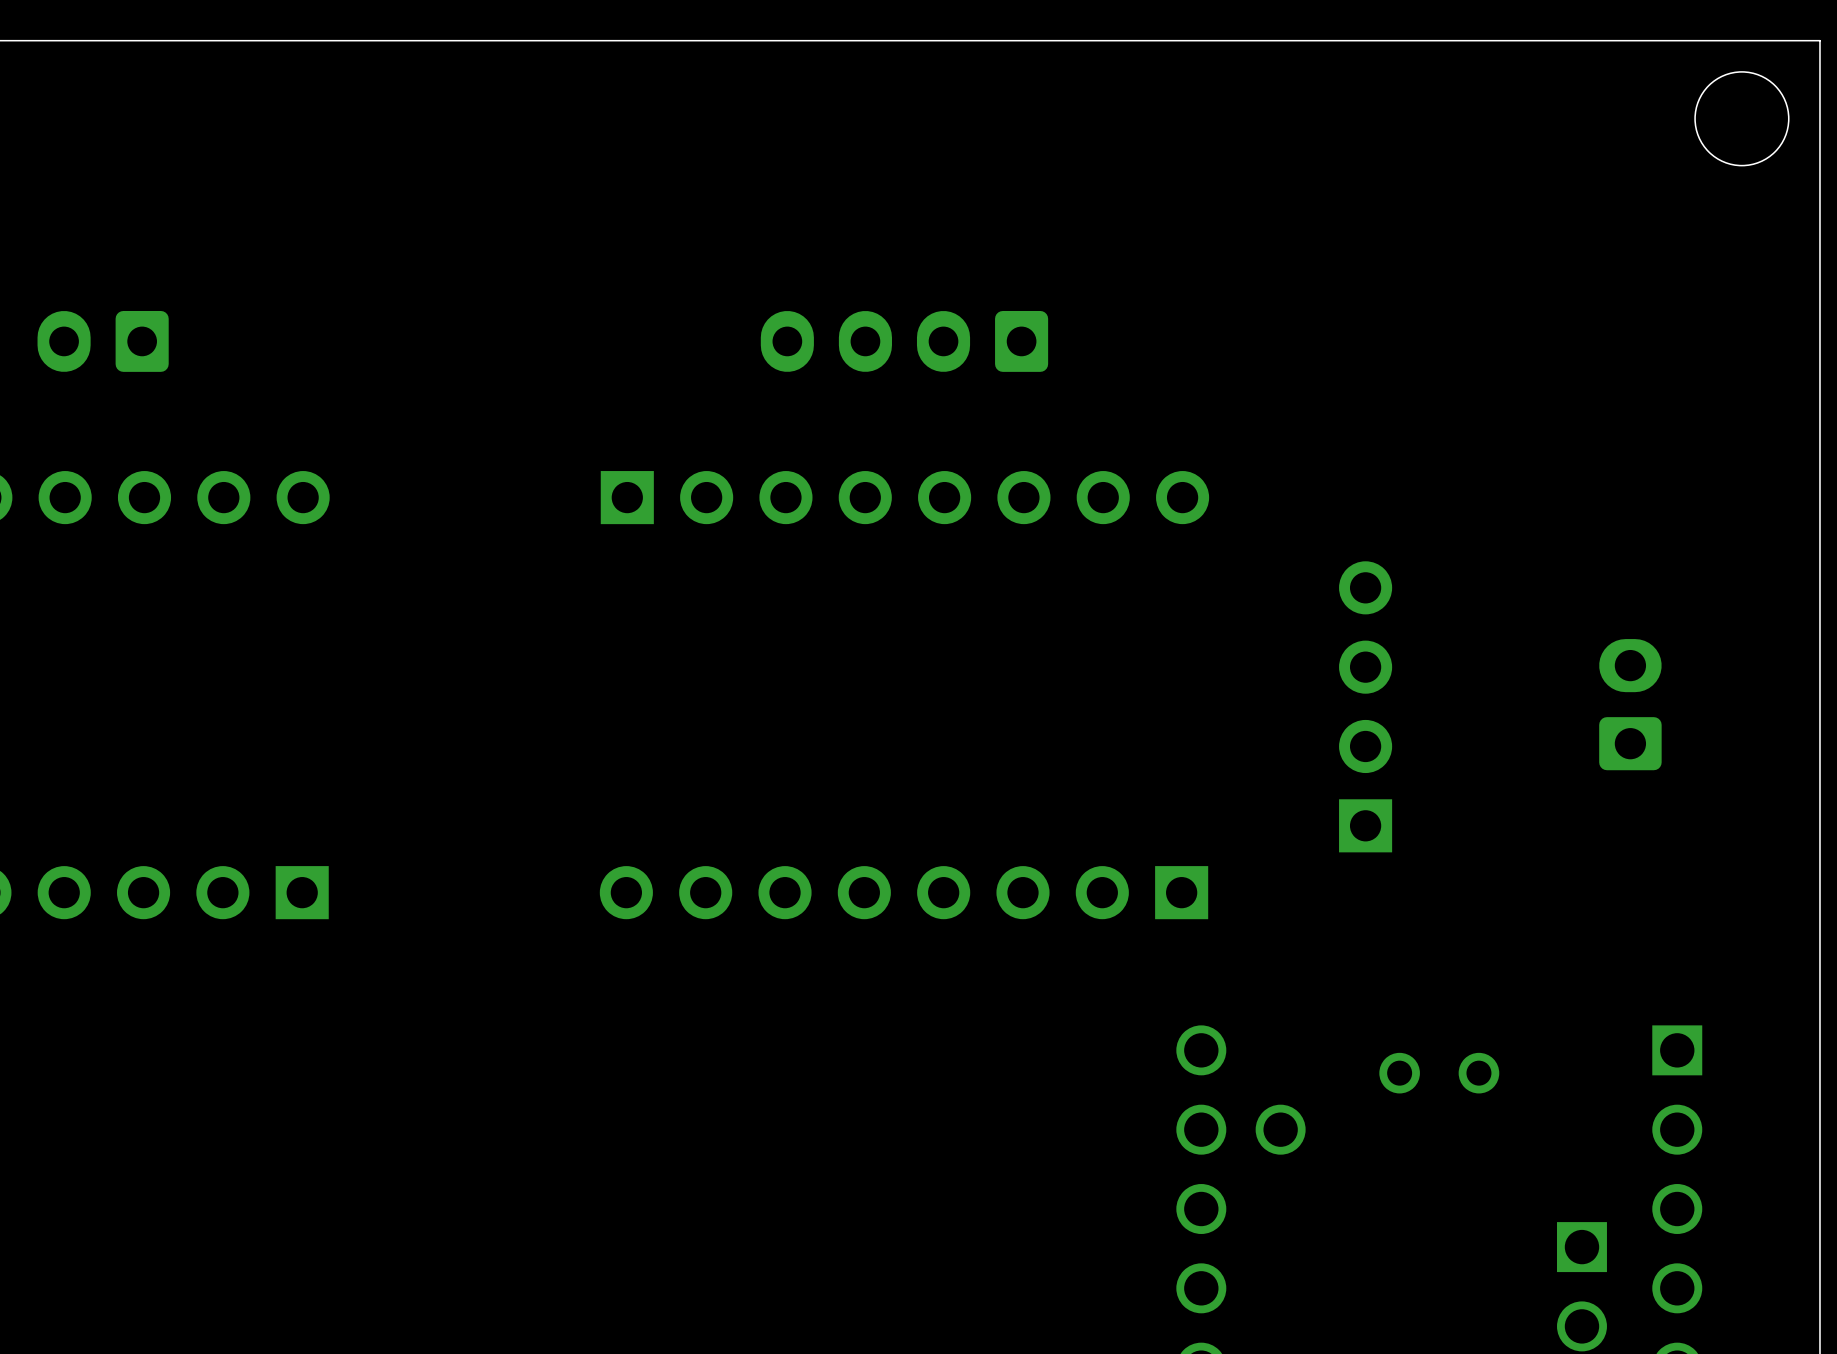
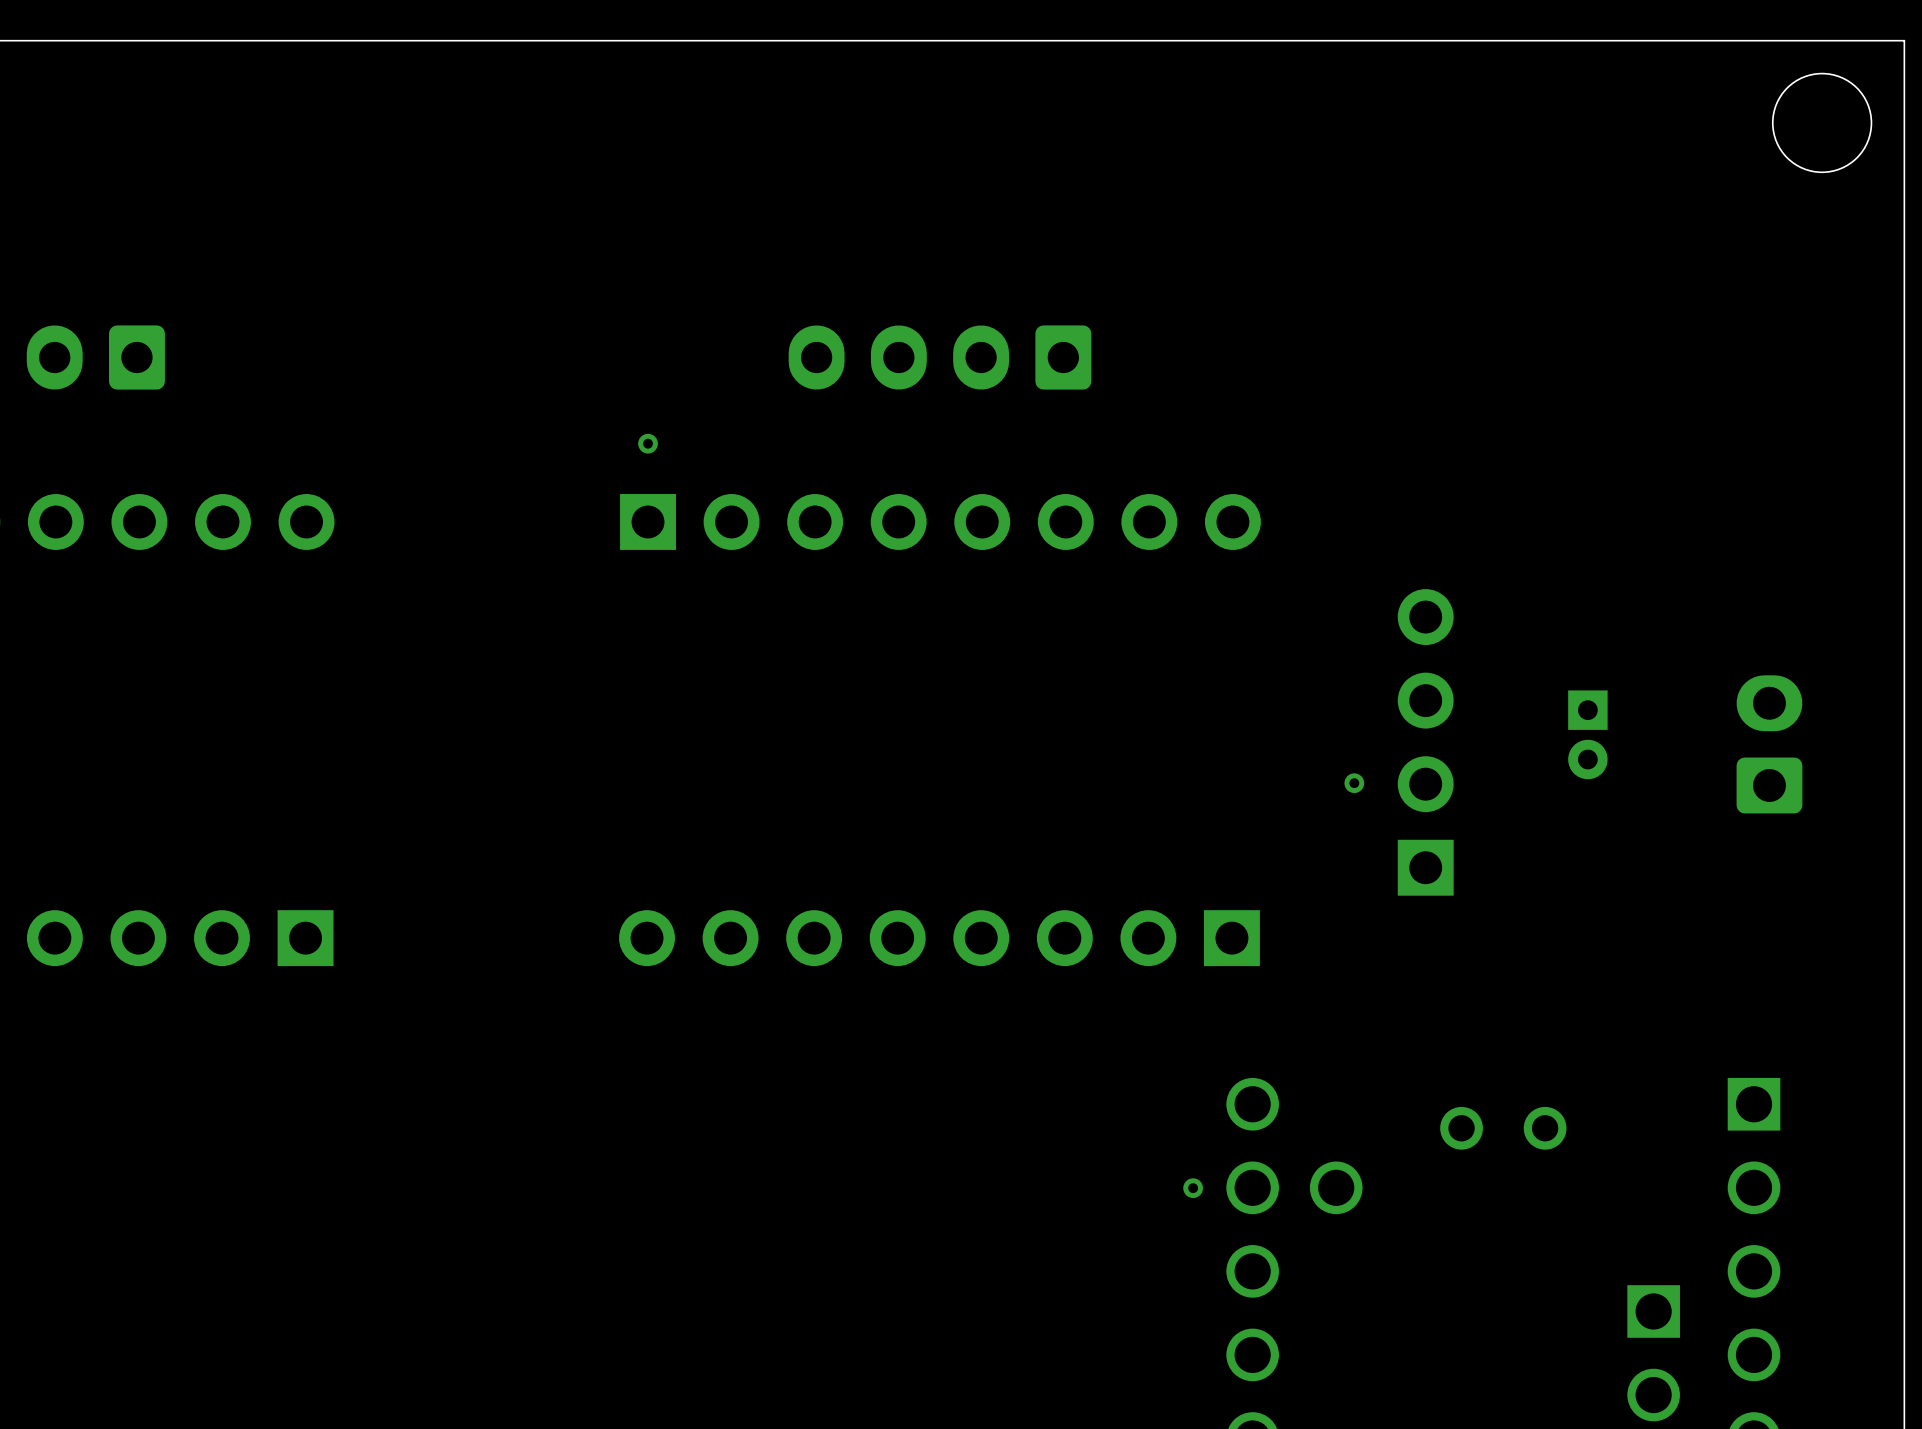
via: none -> (648, 443)
part: none -> (1587, 734)
part position: (1630, 704) -> (1769, 744)
via: none -> (1354, 783)
via: none -> (1193, 1188)

